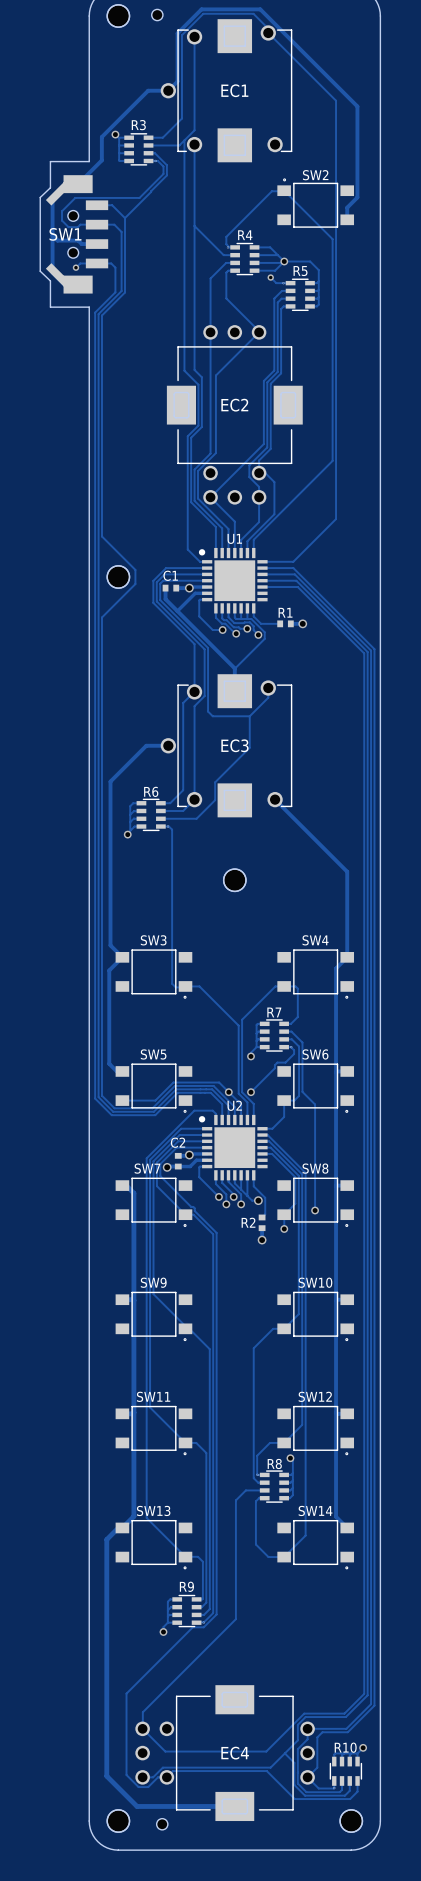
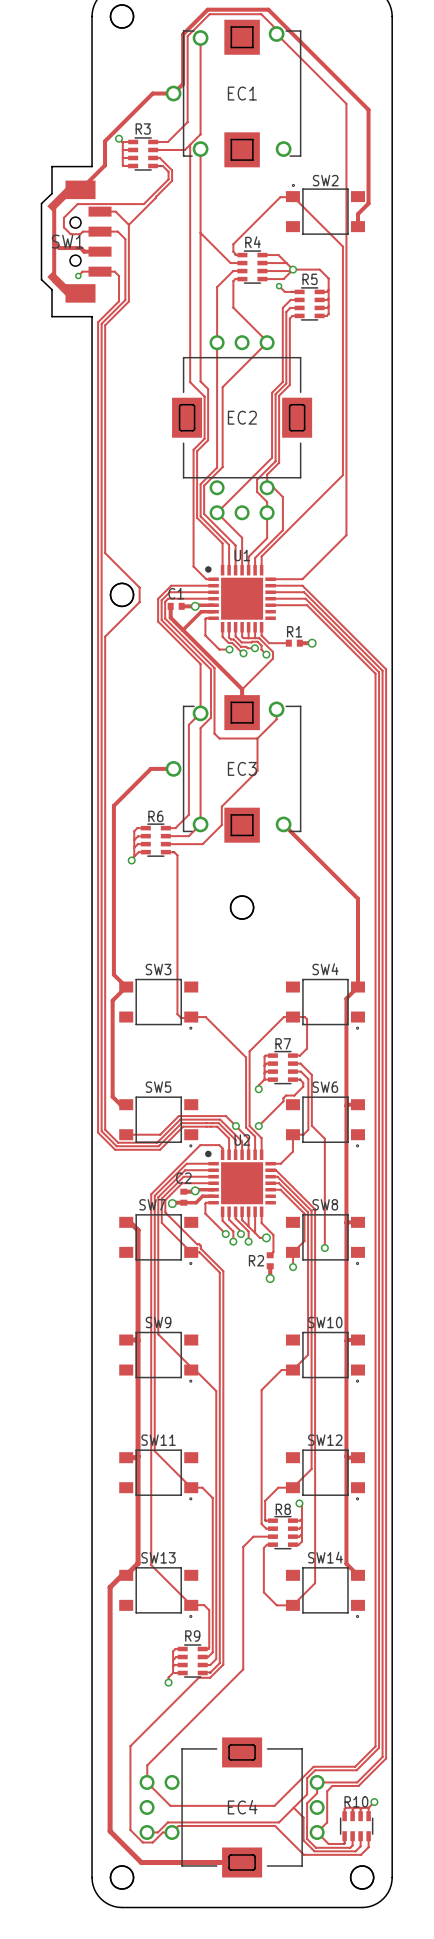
hole: (157, 15) -> none
hole: (162, 1824) -> none

